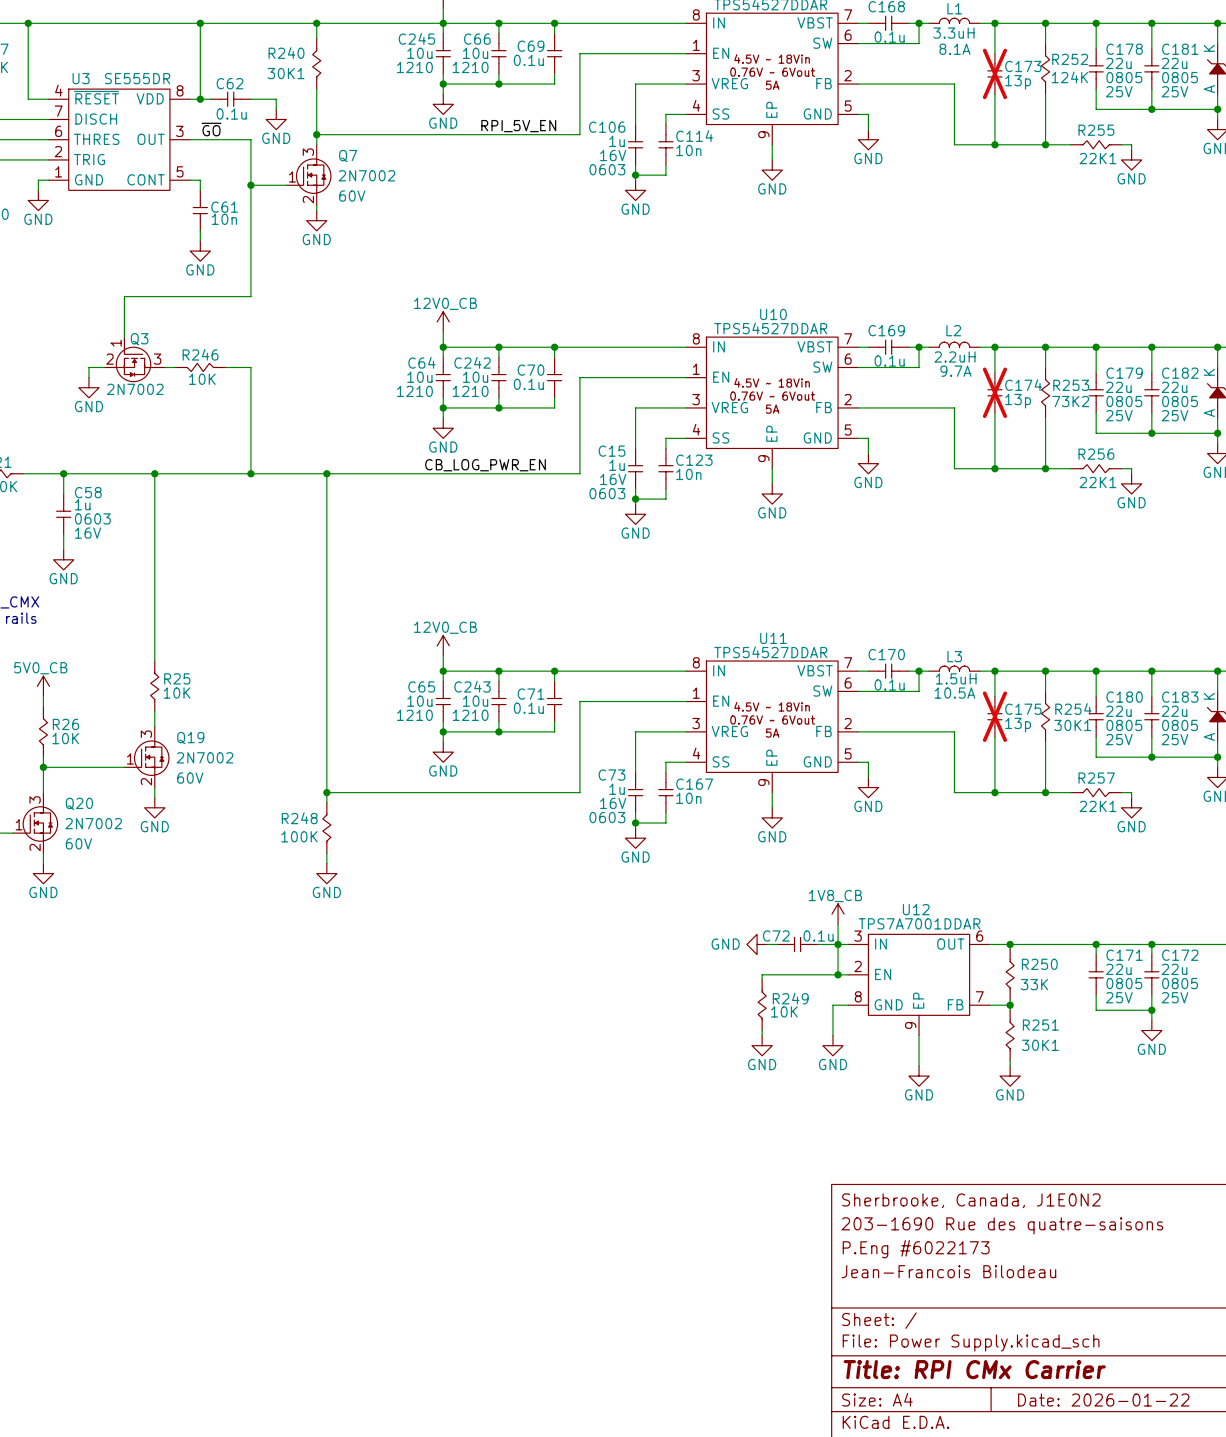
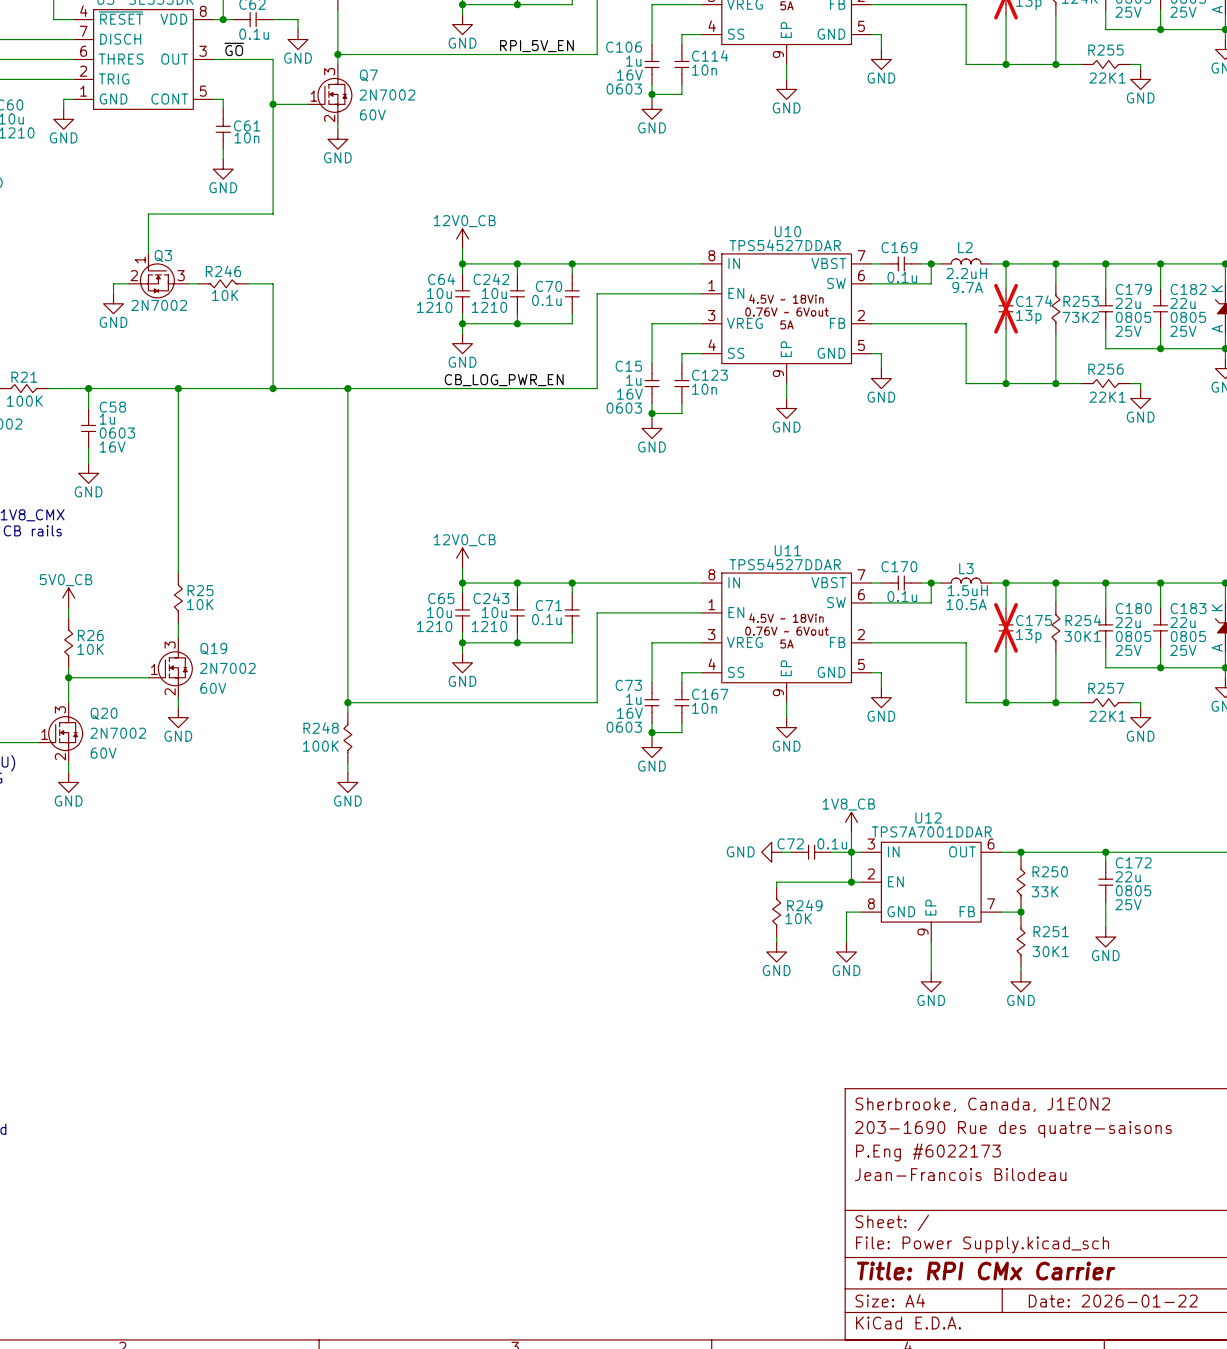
wire: (1151, 944) (1151, 954) -> none
junction: (1151, 944) -> none
C171 name: C171 (1124, 955) -> C172 (1133, 862)
C172: 22u (1151, 974) -> none
wire: (1151, 995) (1151, 1020) -> none
wire: (1096, 1010) (1151, 1010) -> (1105, 917) (1105, 927)
junction: (1151, 1010) -> none
power symbol position: GND (1151, 1030) -> GND (1105, 937)

